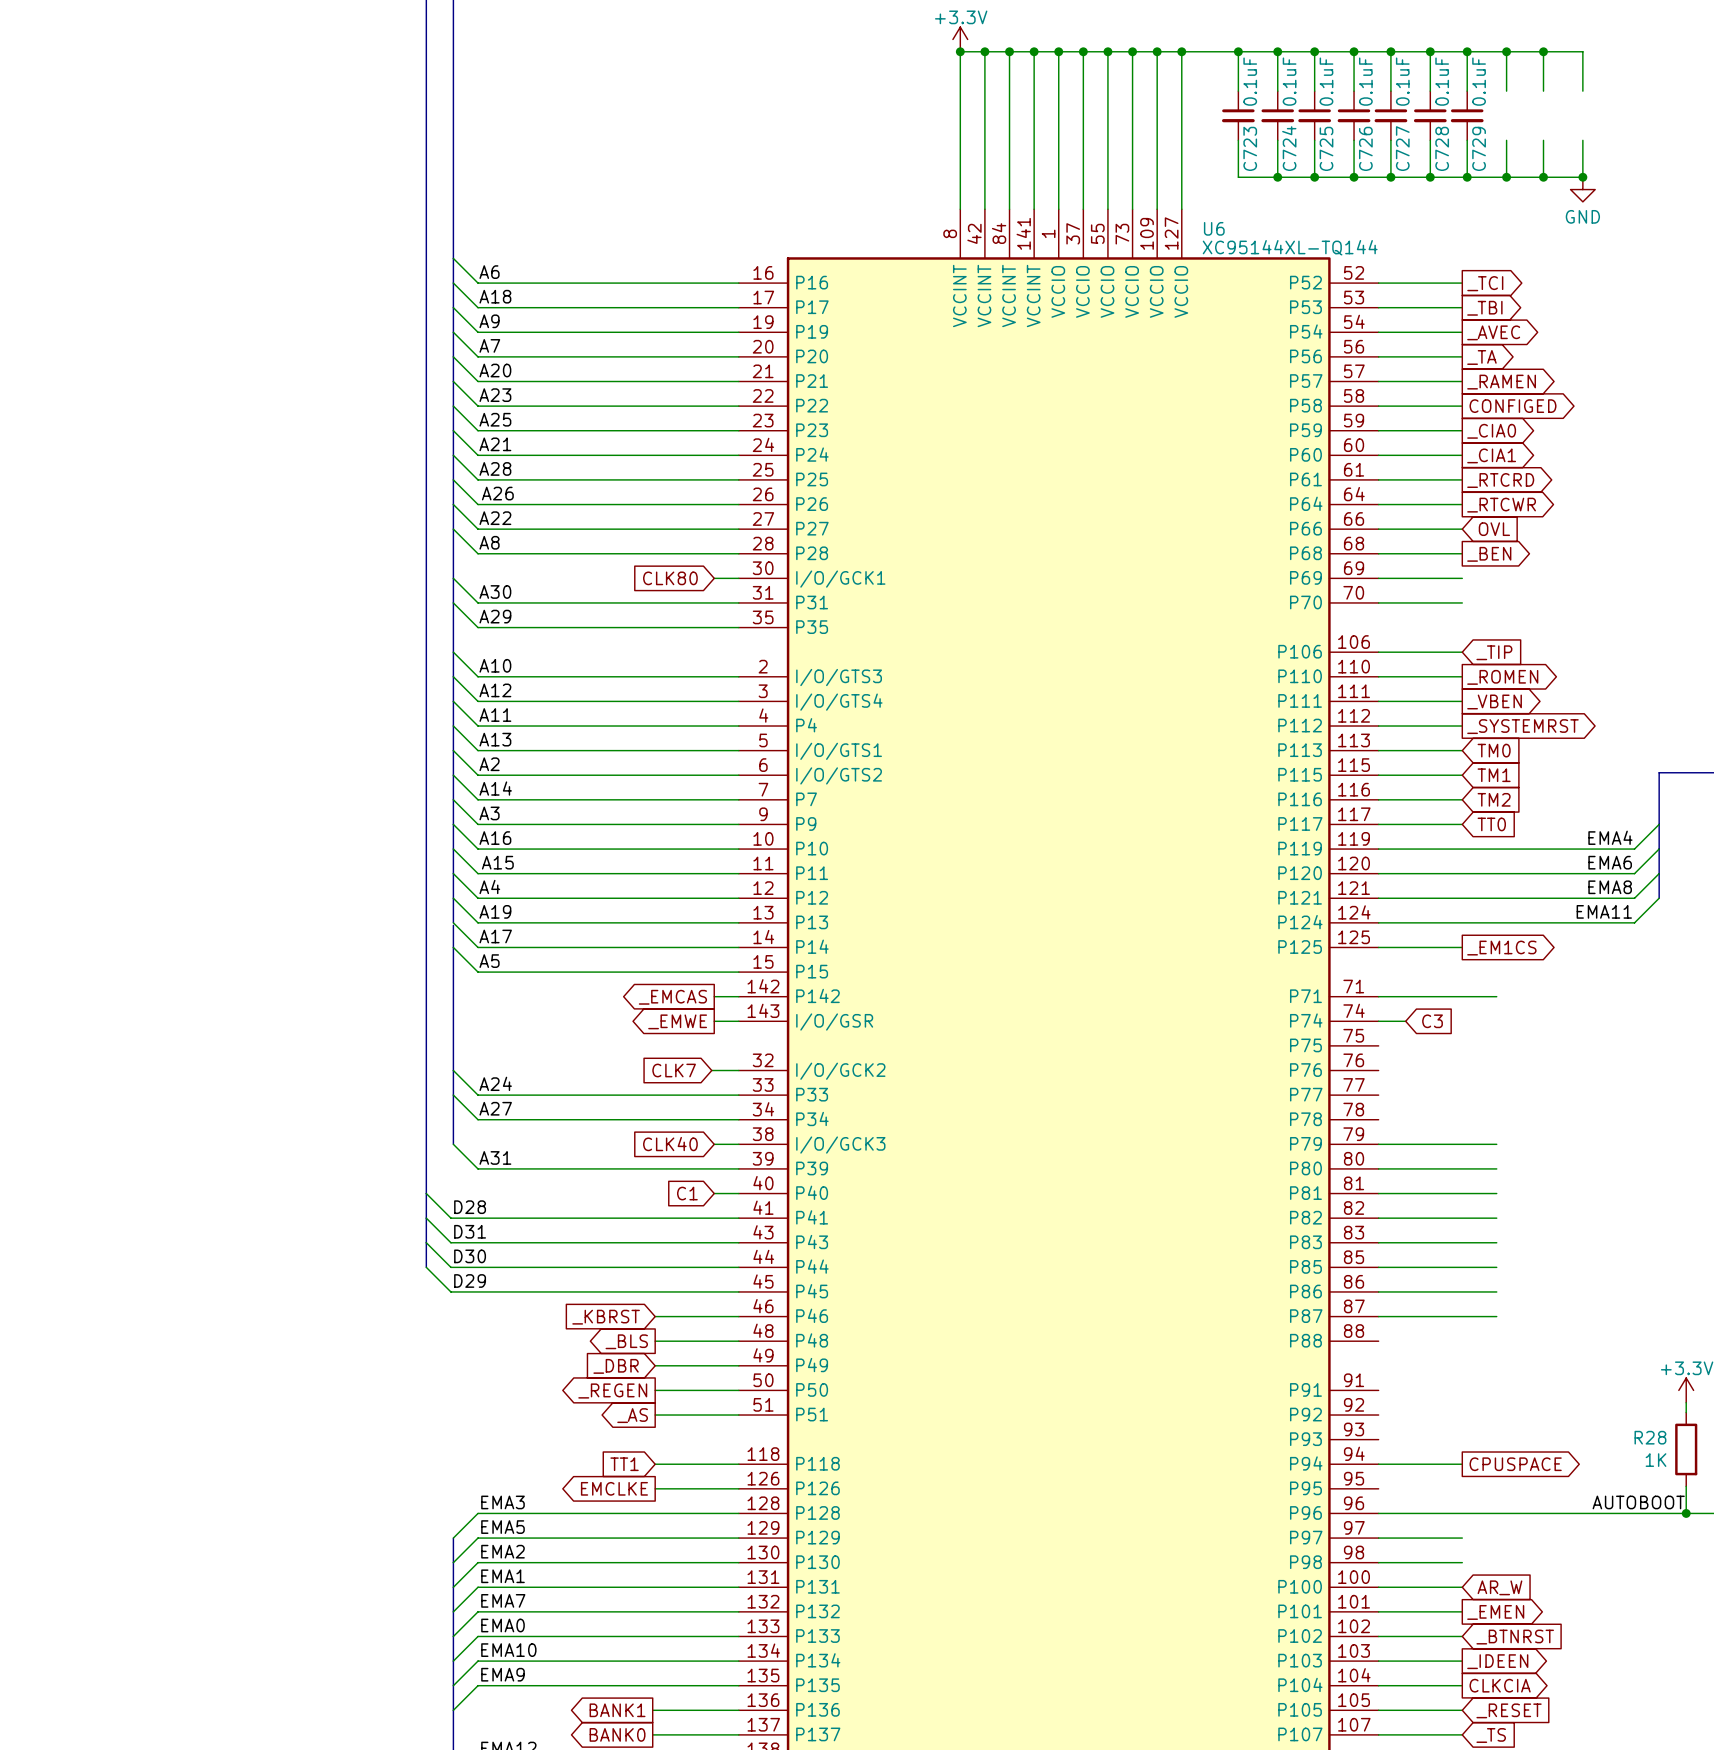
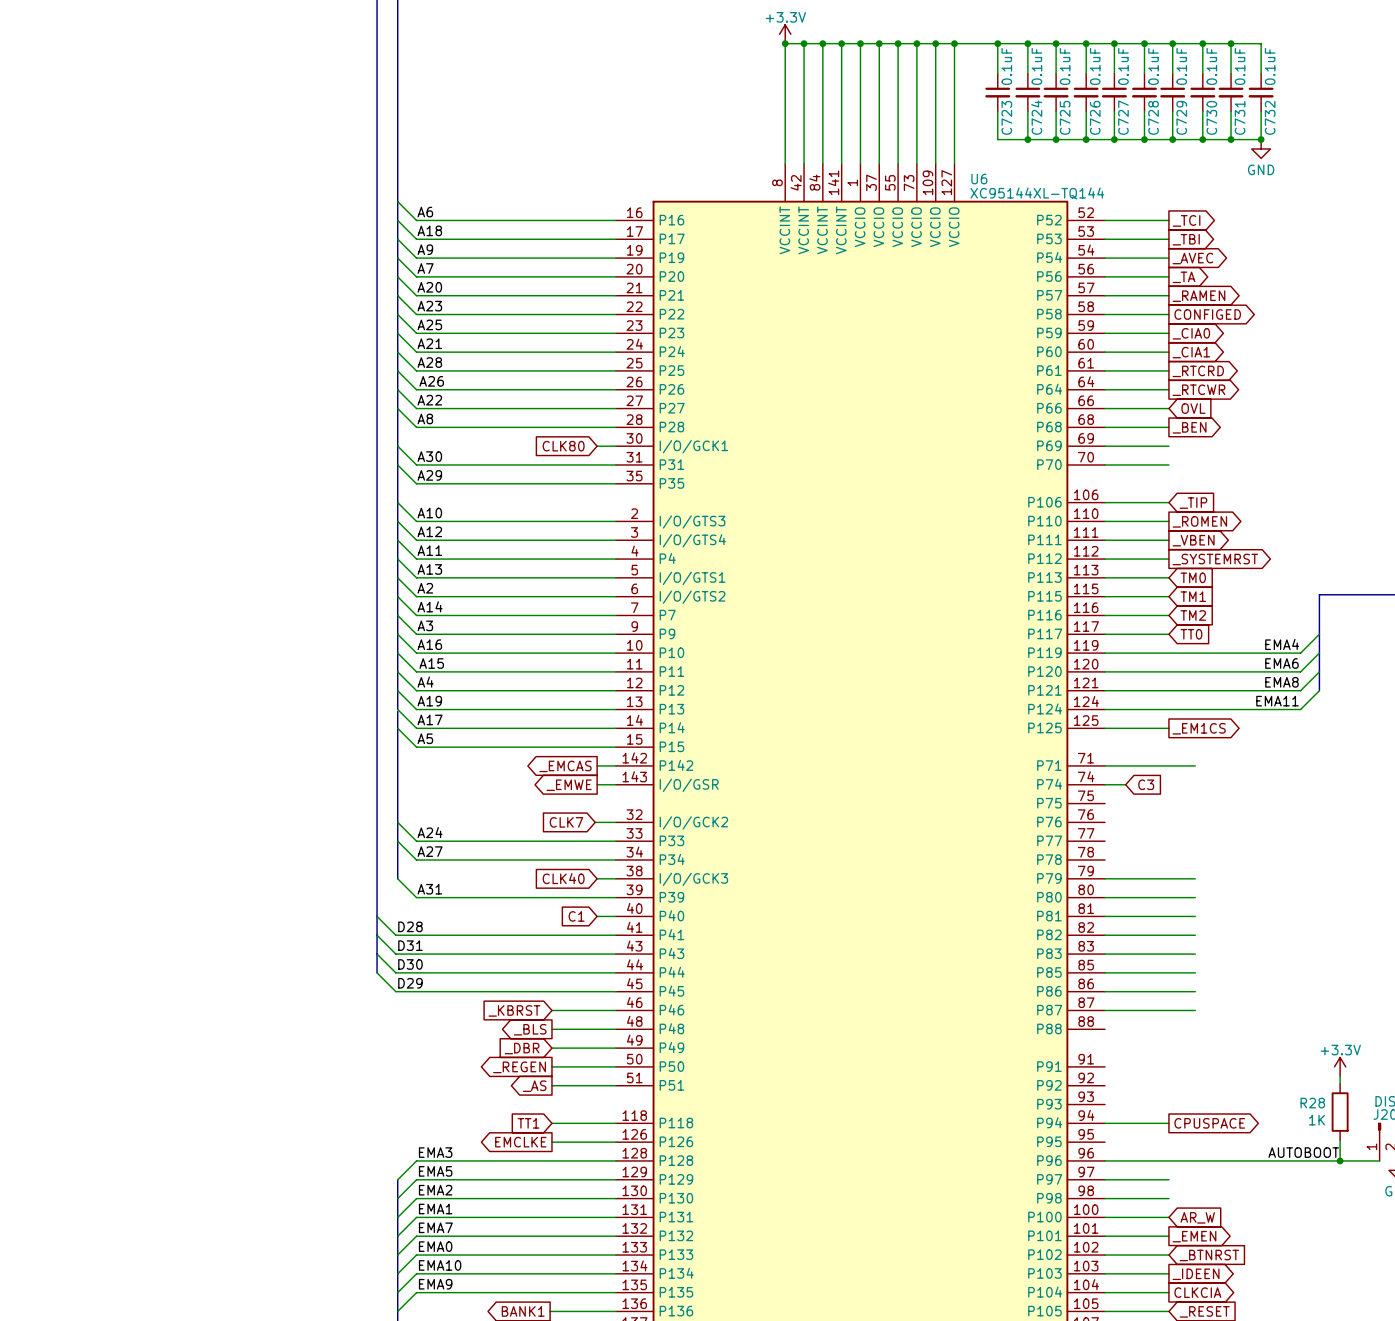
C730: none -> 0.1uF (1202, 92)
C731: none -> 0.1uF (1231, 92)
C732: none -> 0.1uF (1261, 92)

